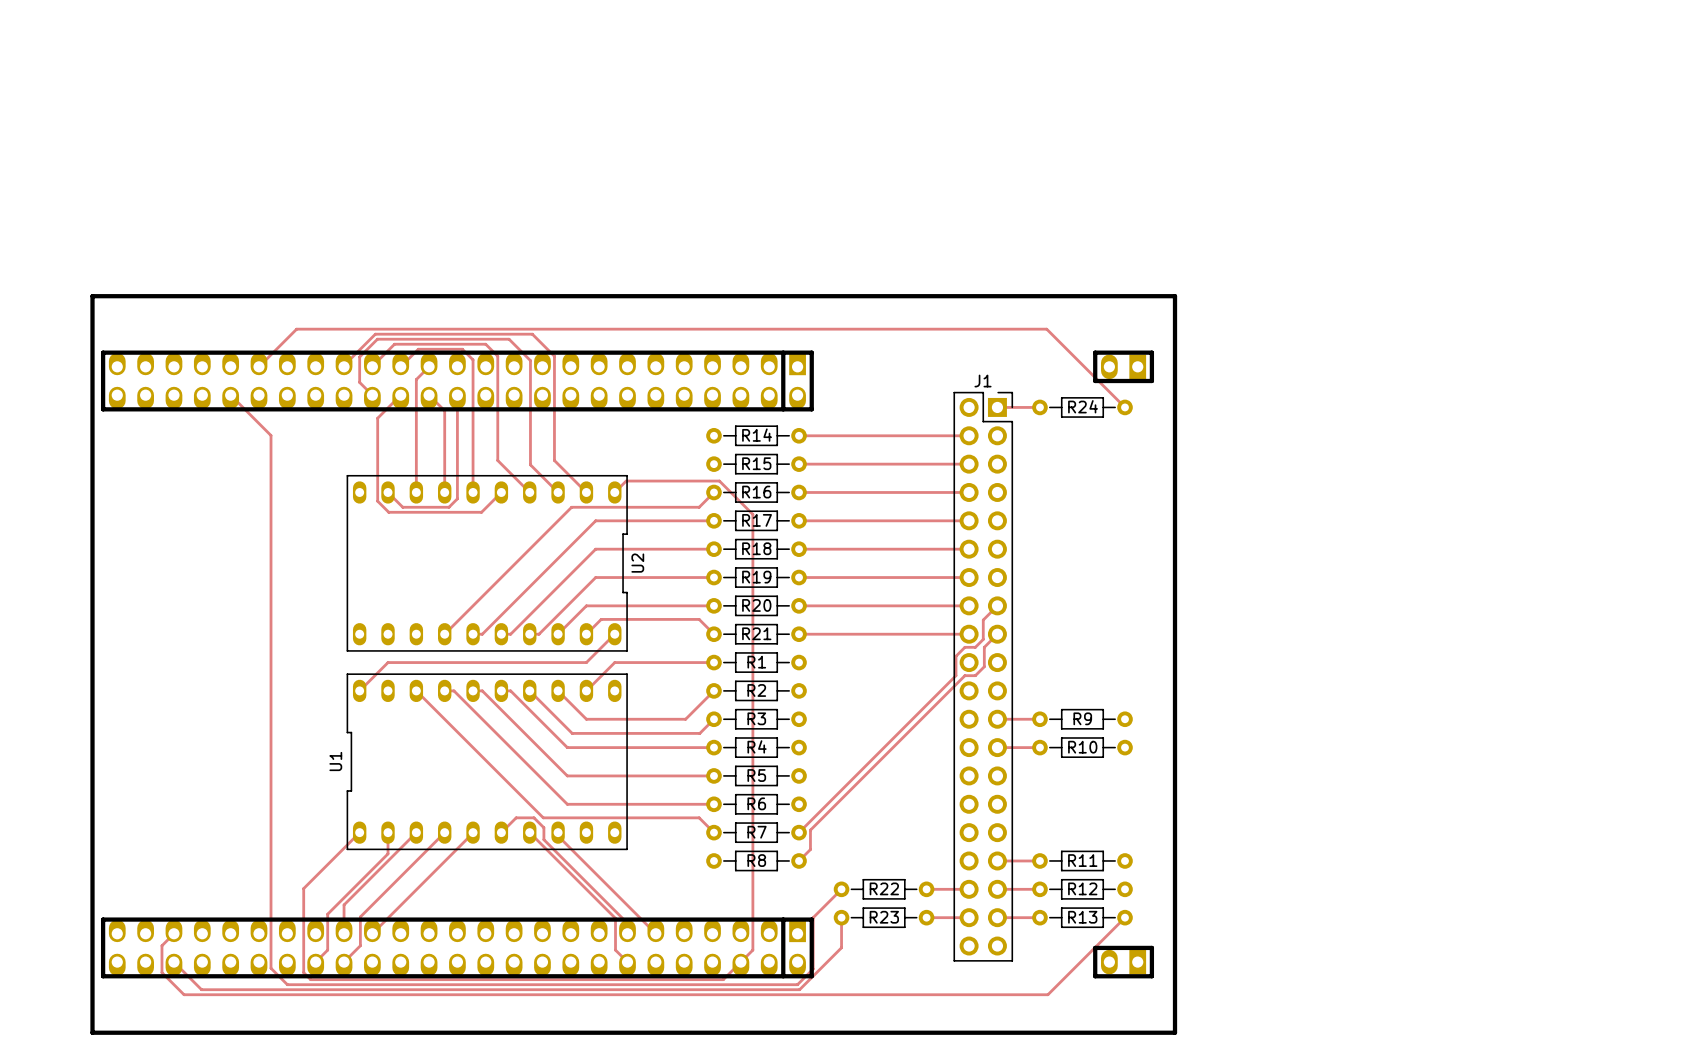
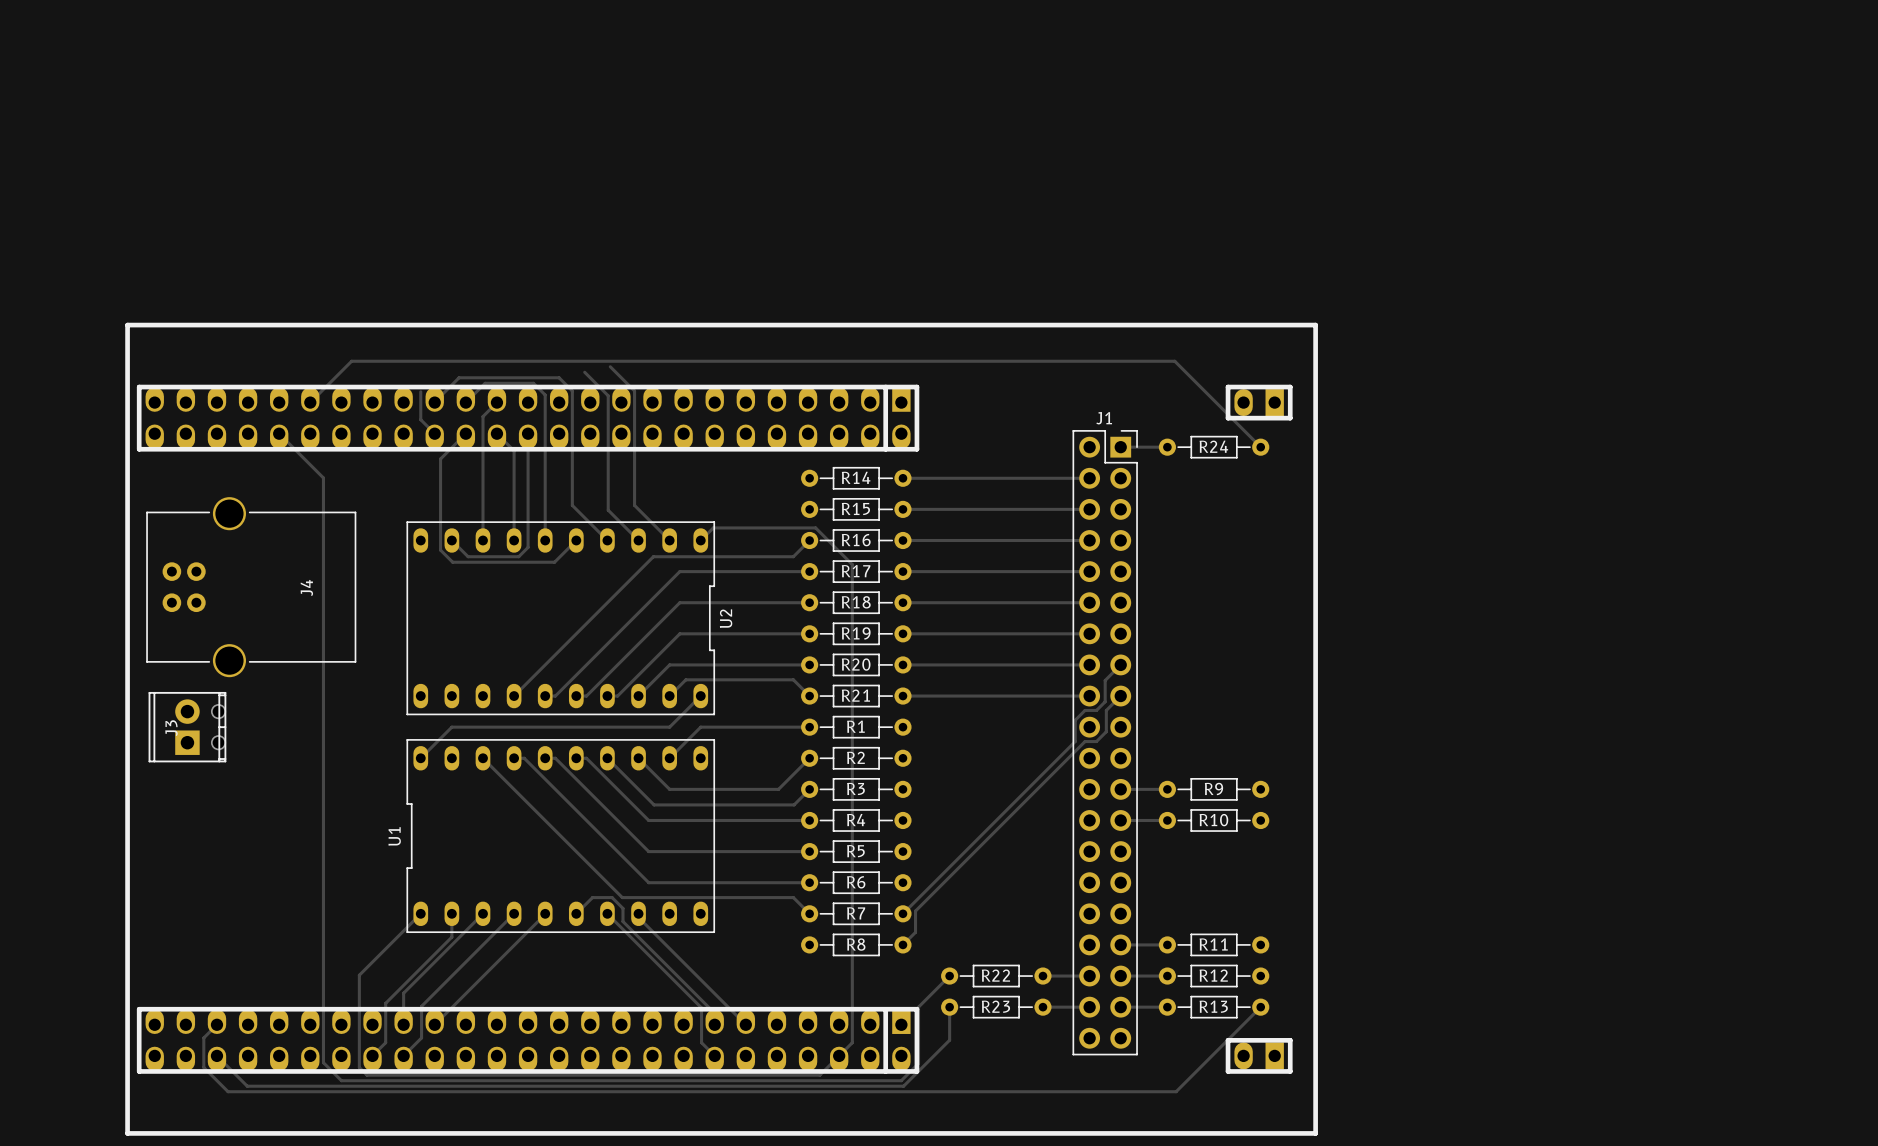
track: (532, 334) (375, 334) (344, 365) -> none
track: (509, 339) (377, 339) (359, 357) -> none
J4: none -> (251, 587)
J3: none -> (187, 727)

